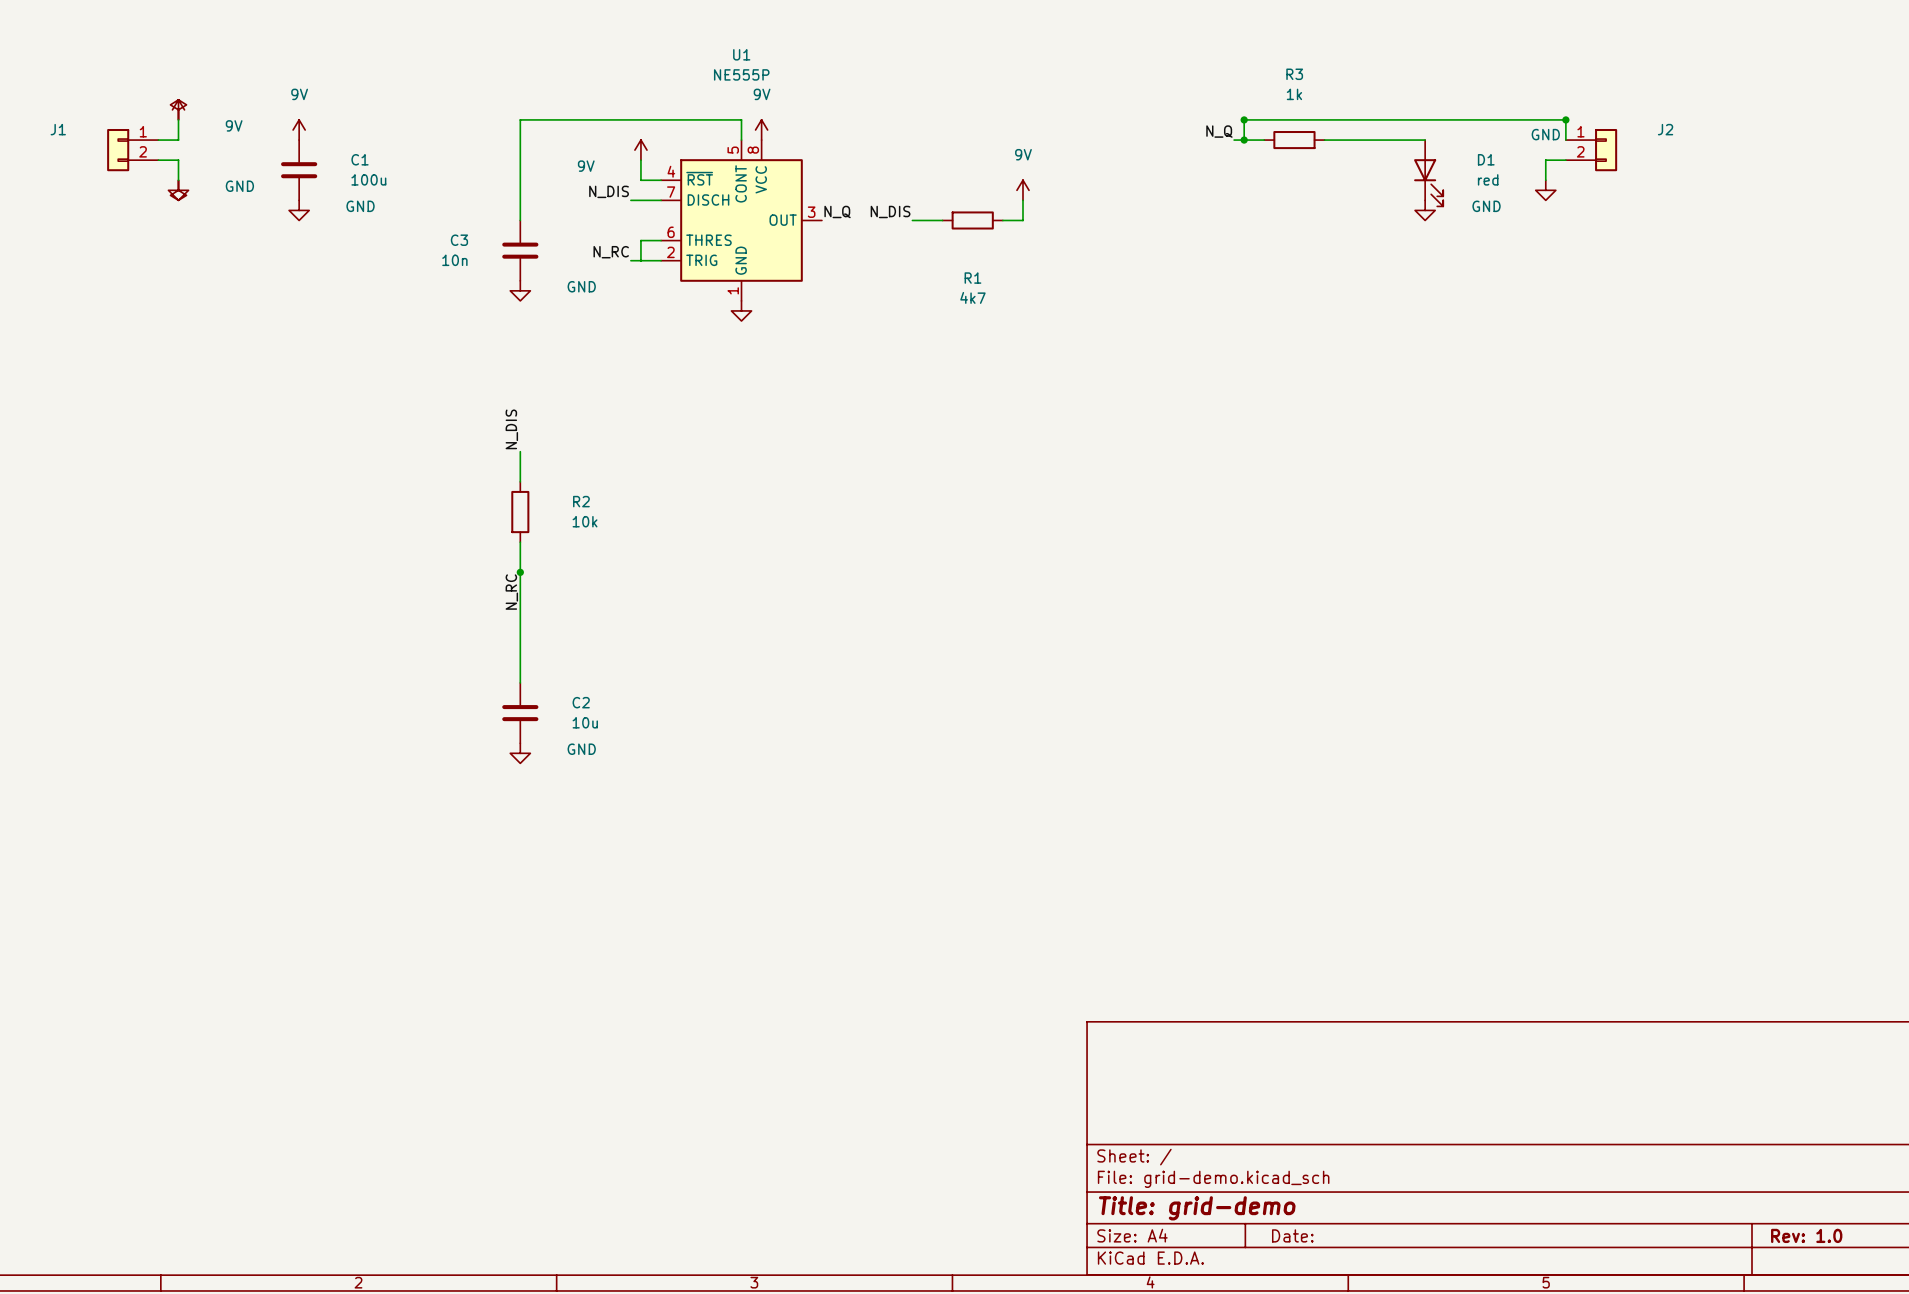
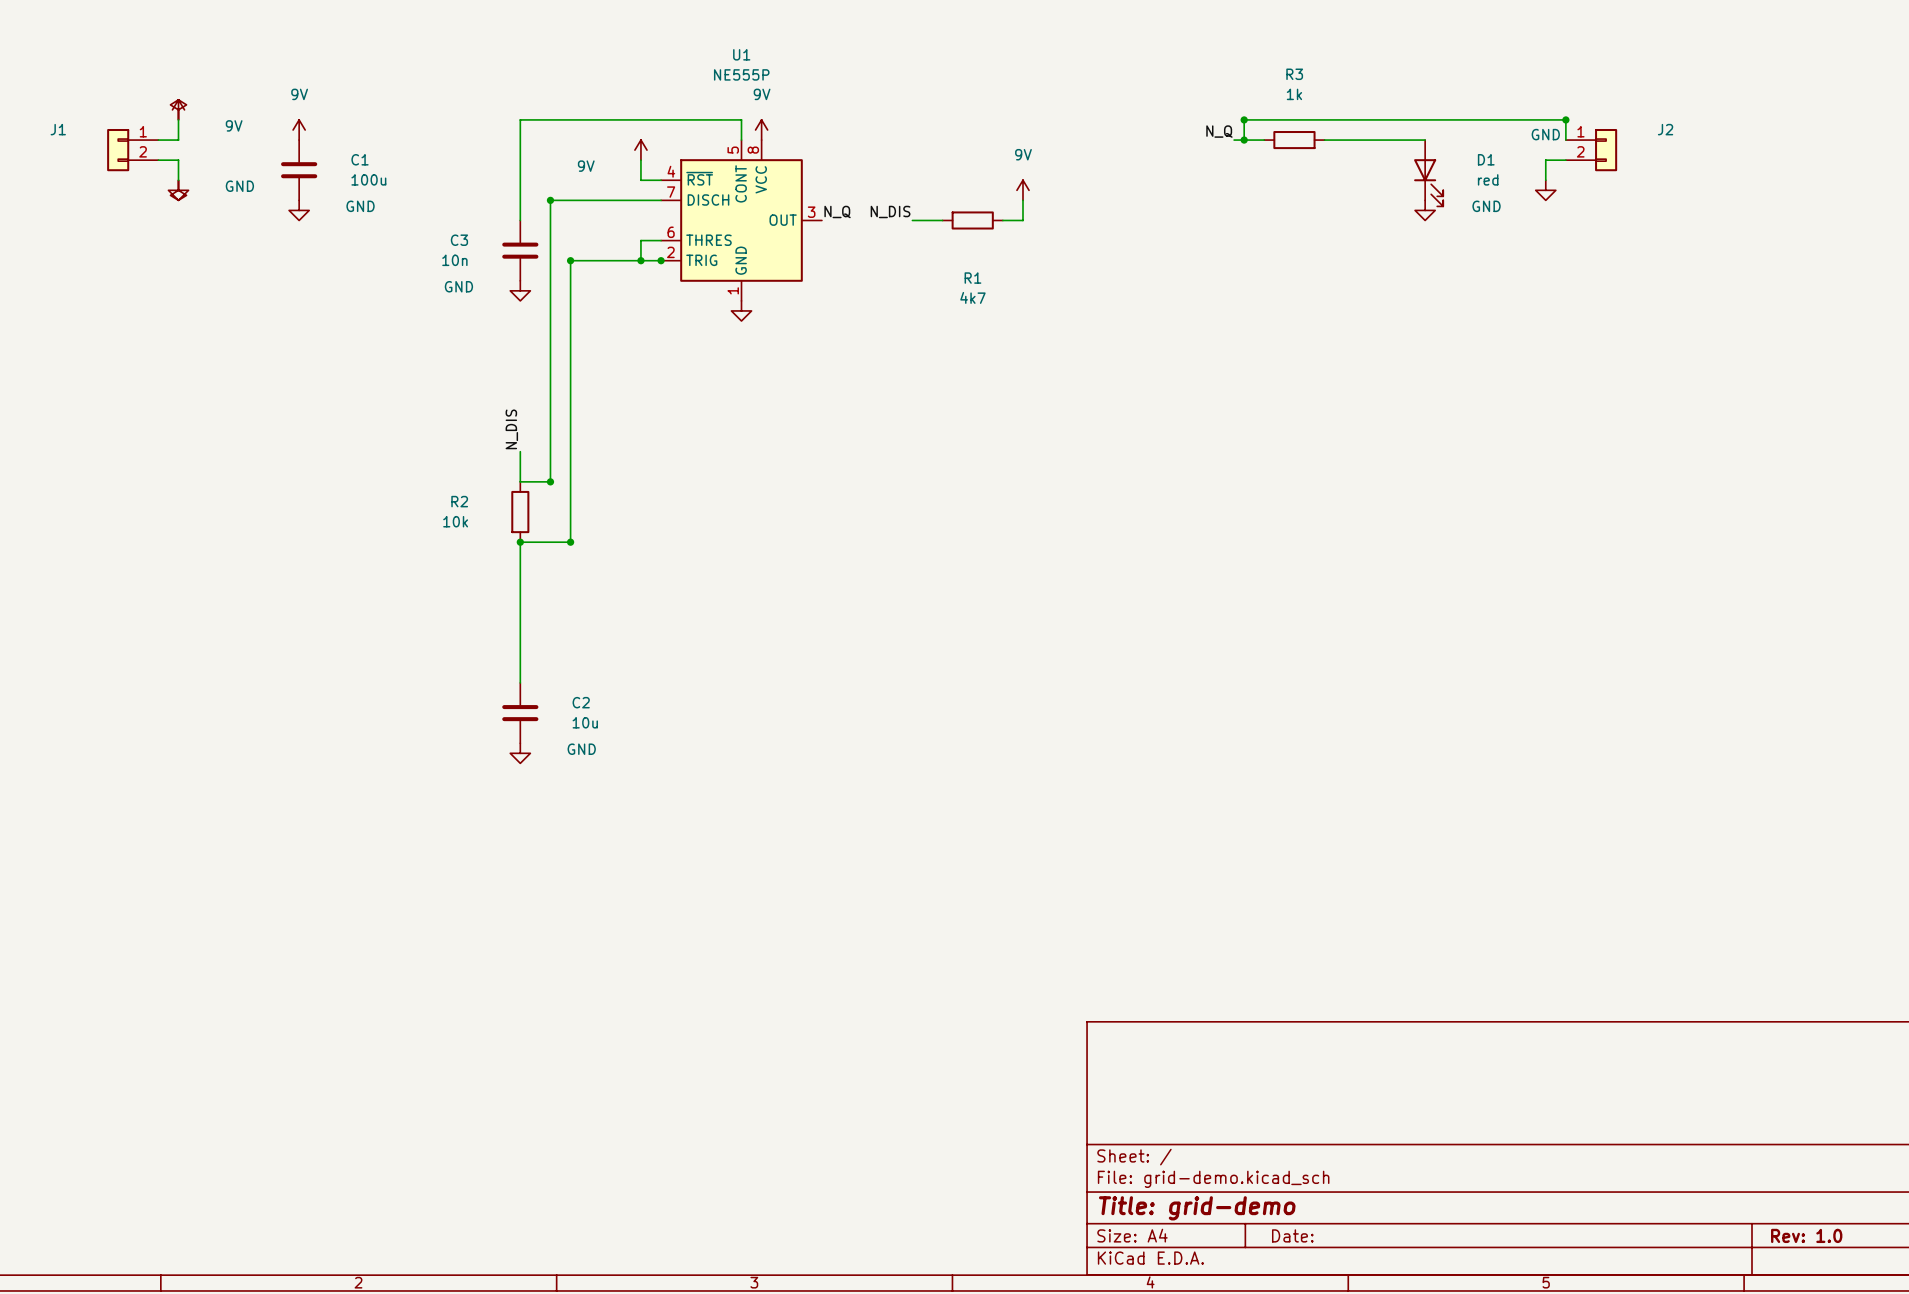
label: N_DIS (609, 191) -> none
junction: none -> (550, 200)
wire: none -> (630, 200) (550, 200) (550, 481) (520, 481)
label: N_RC (611, 252) -> none
junction: none -> (570, 260)
wire: none -> (630, 260) (570, 260) (570, 542) (520, 542)
junction: none -> (640, 260)
junction: none -> (661, 260)
power symbol text position: GND (581, 286) -> GND (458, 286)
junction: none -> (550, 481)
R2 name position: R2 (581, 501) -> R2 (459, 501)
R2 value position: 10k (585, 521) -> 10k (455, 521)
junction: none -> (520, 542)
junction: none -> (570, 542)
junction: (520, 572) -> none
label: N_RC (511, 592) -> none

